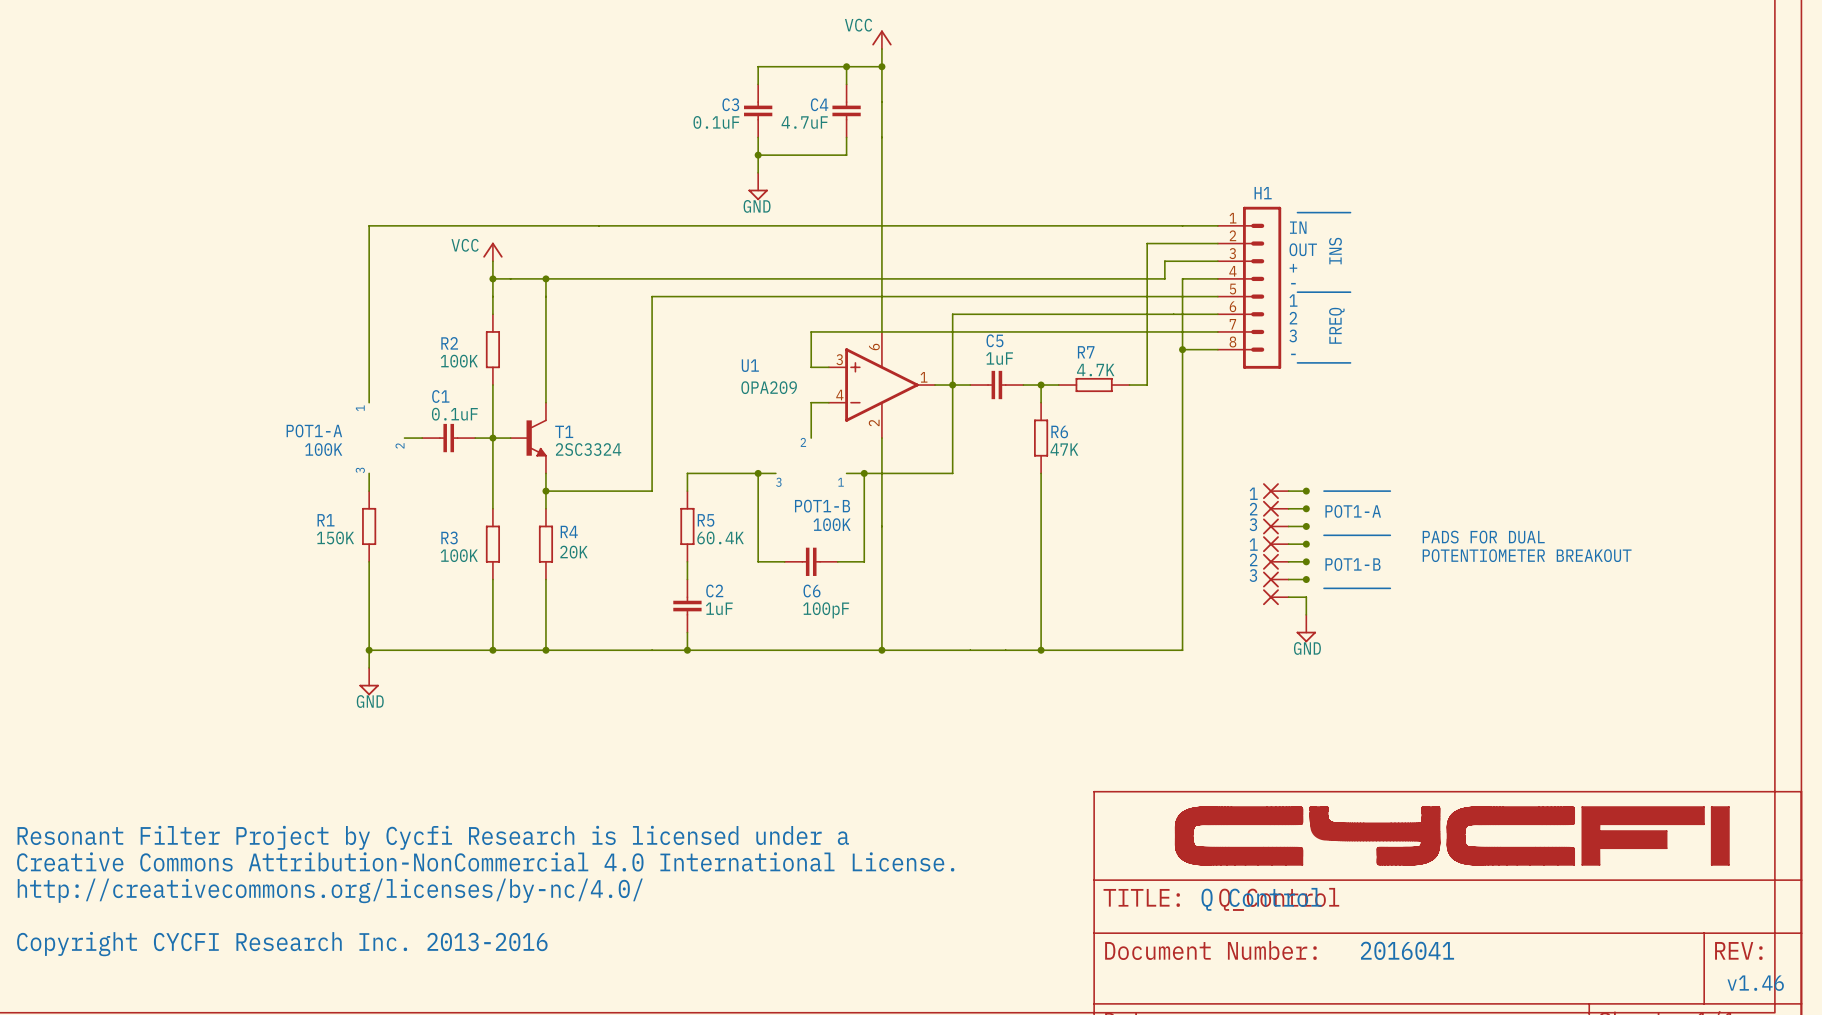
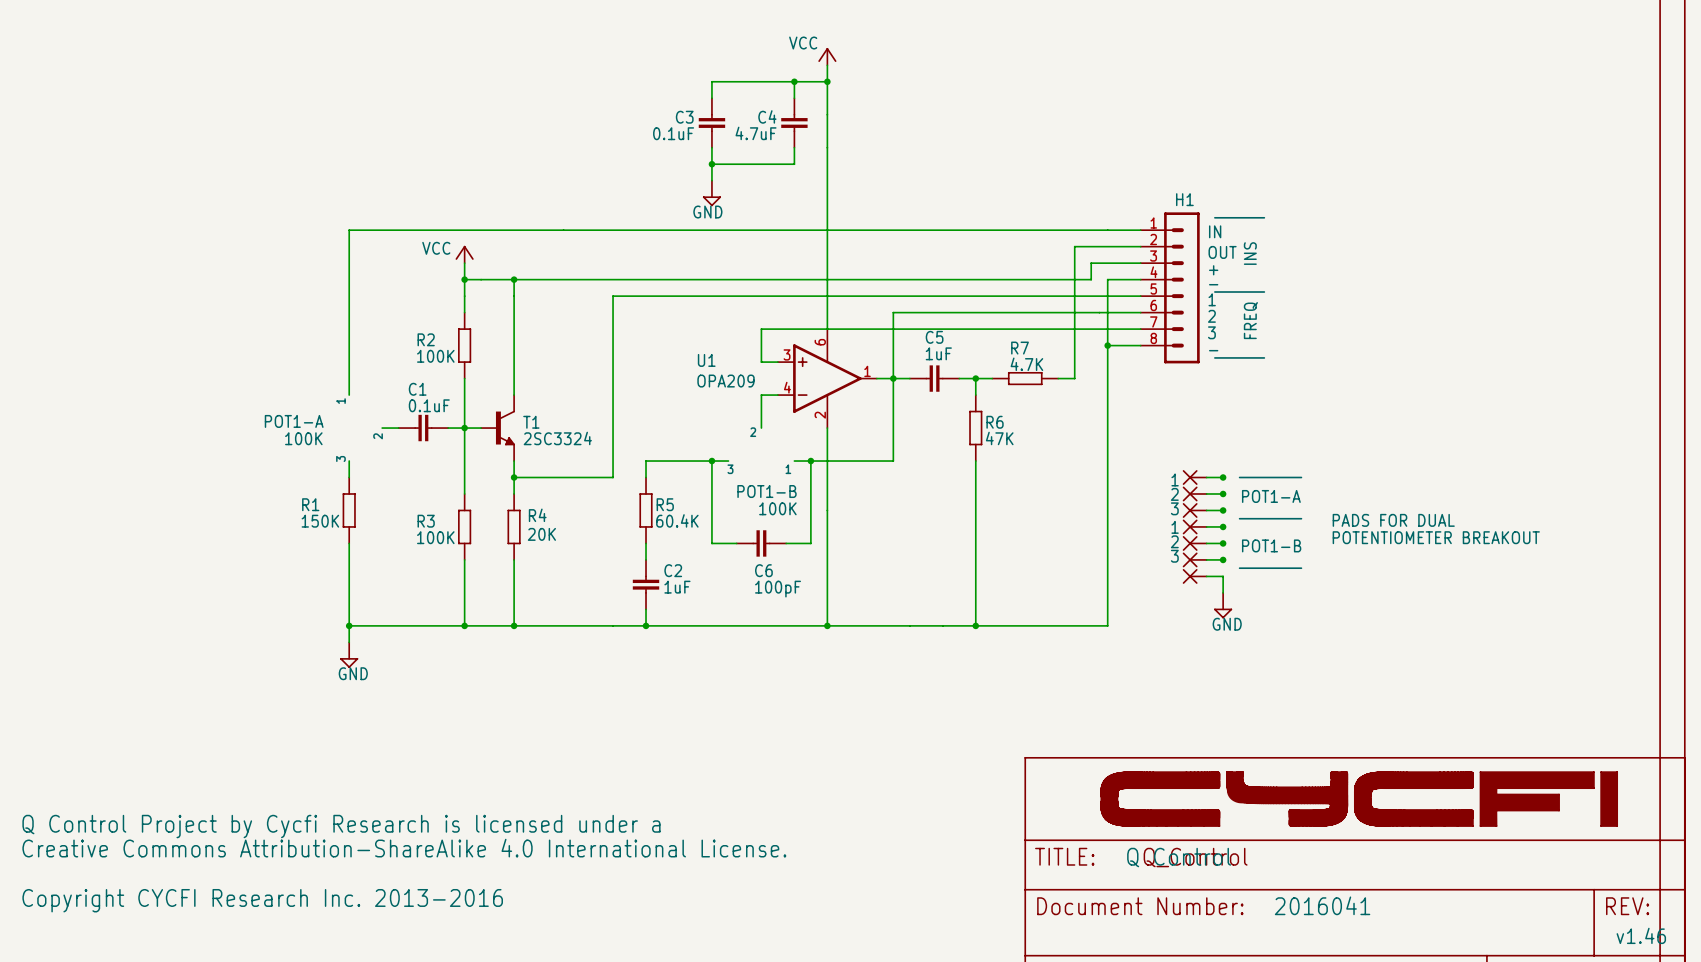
text: Resonant Filter Project by Cycfi Research is licensed under a (433, 837) -> none
text: Creative Commons Attribution-NonCommercial 4.0 International License. (485, 861) -> Q Control Project by Cycfi Research is licensed under a (341, 826)
text: http://creativecommons.org/licenses/by-nc/4.0/ (330, 890) -> Creative Commons Attribution-ShareAlike 4.0 International License. (404, 848)

